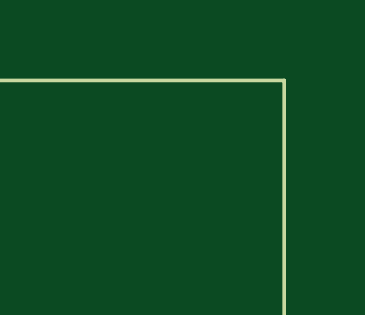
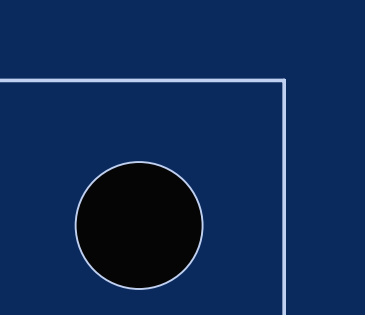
part: none -> (139, 225)

